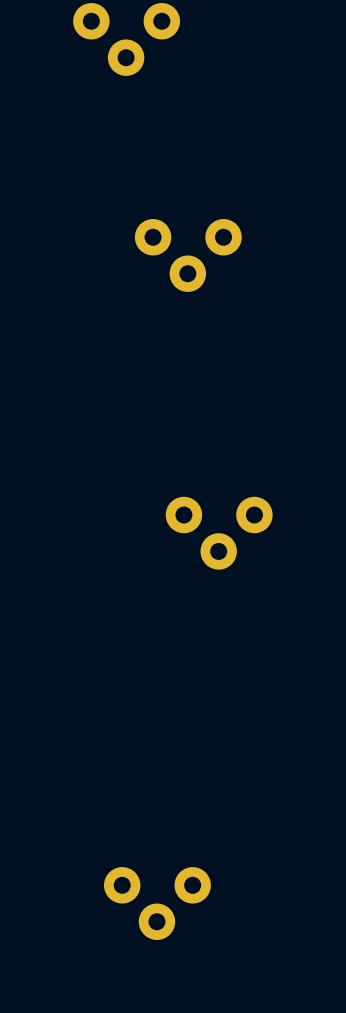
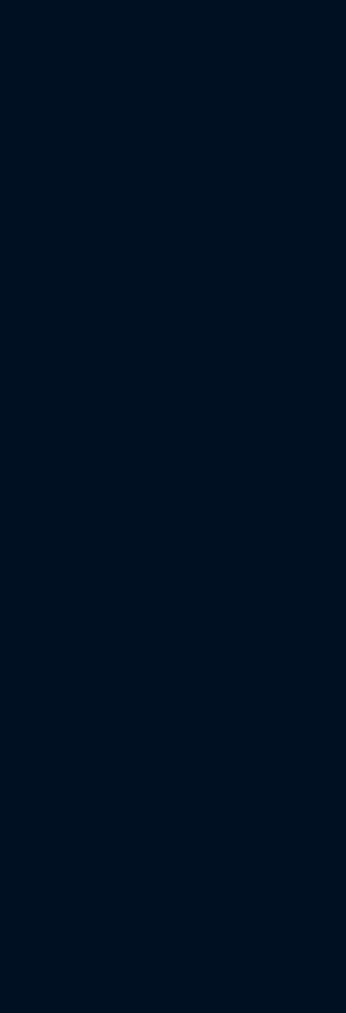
part: (126, 39) -> none
part: (188, 255) -> none
part: (219, 533) -> none
part: (157, 903) -> none

